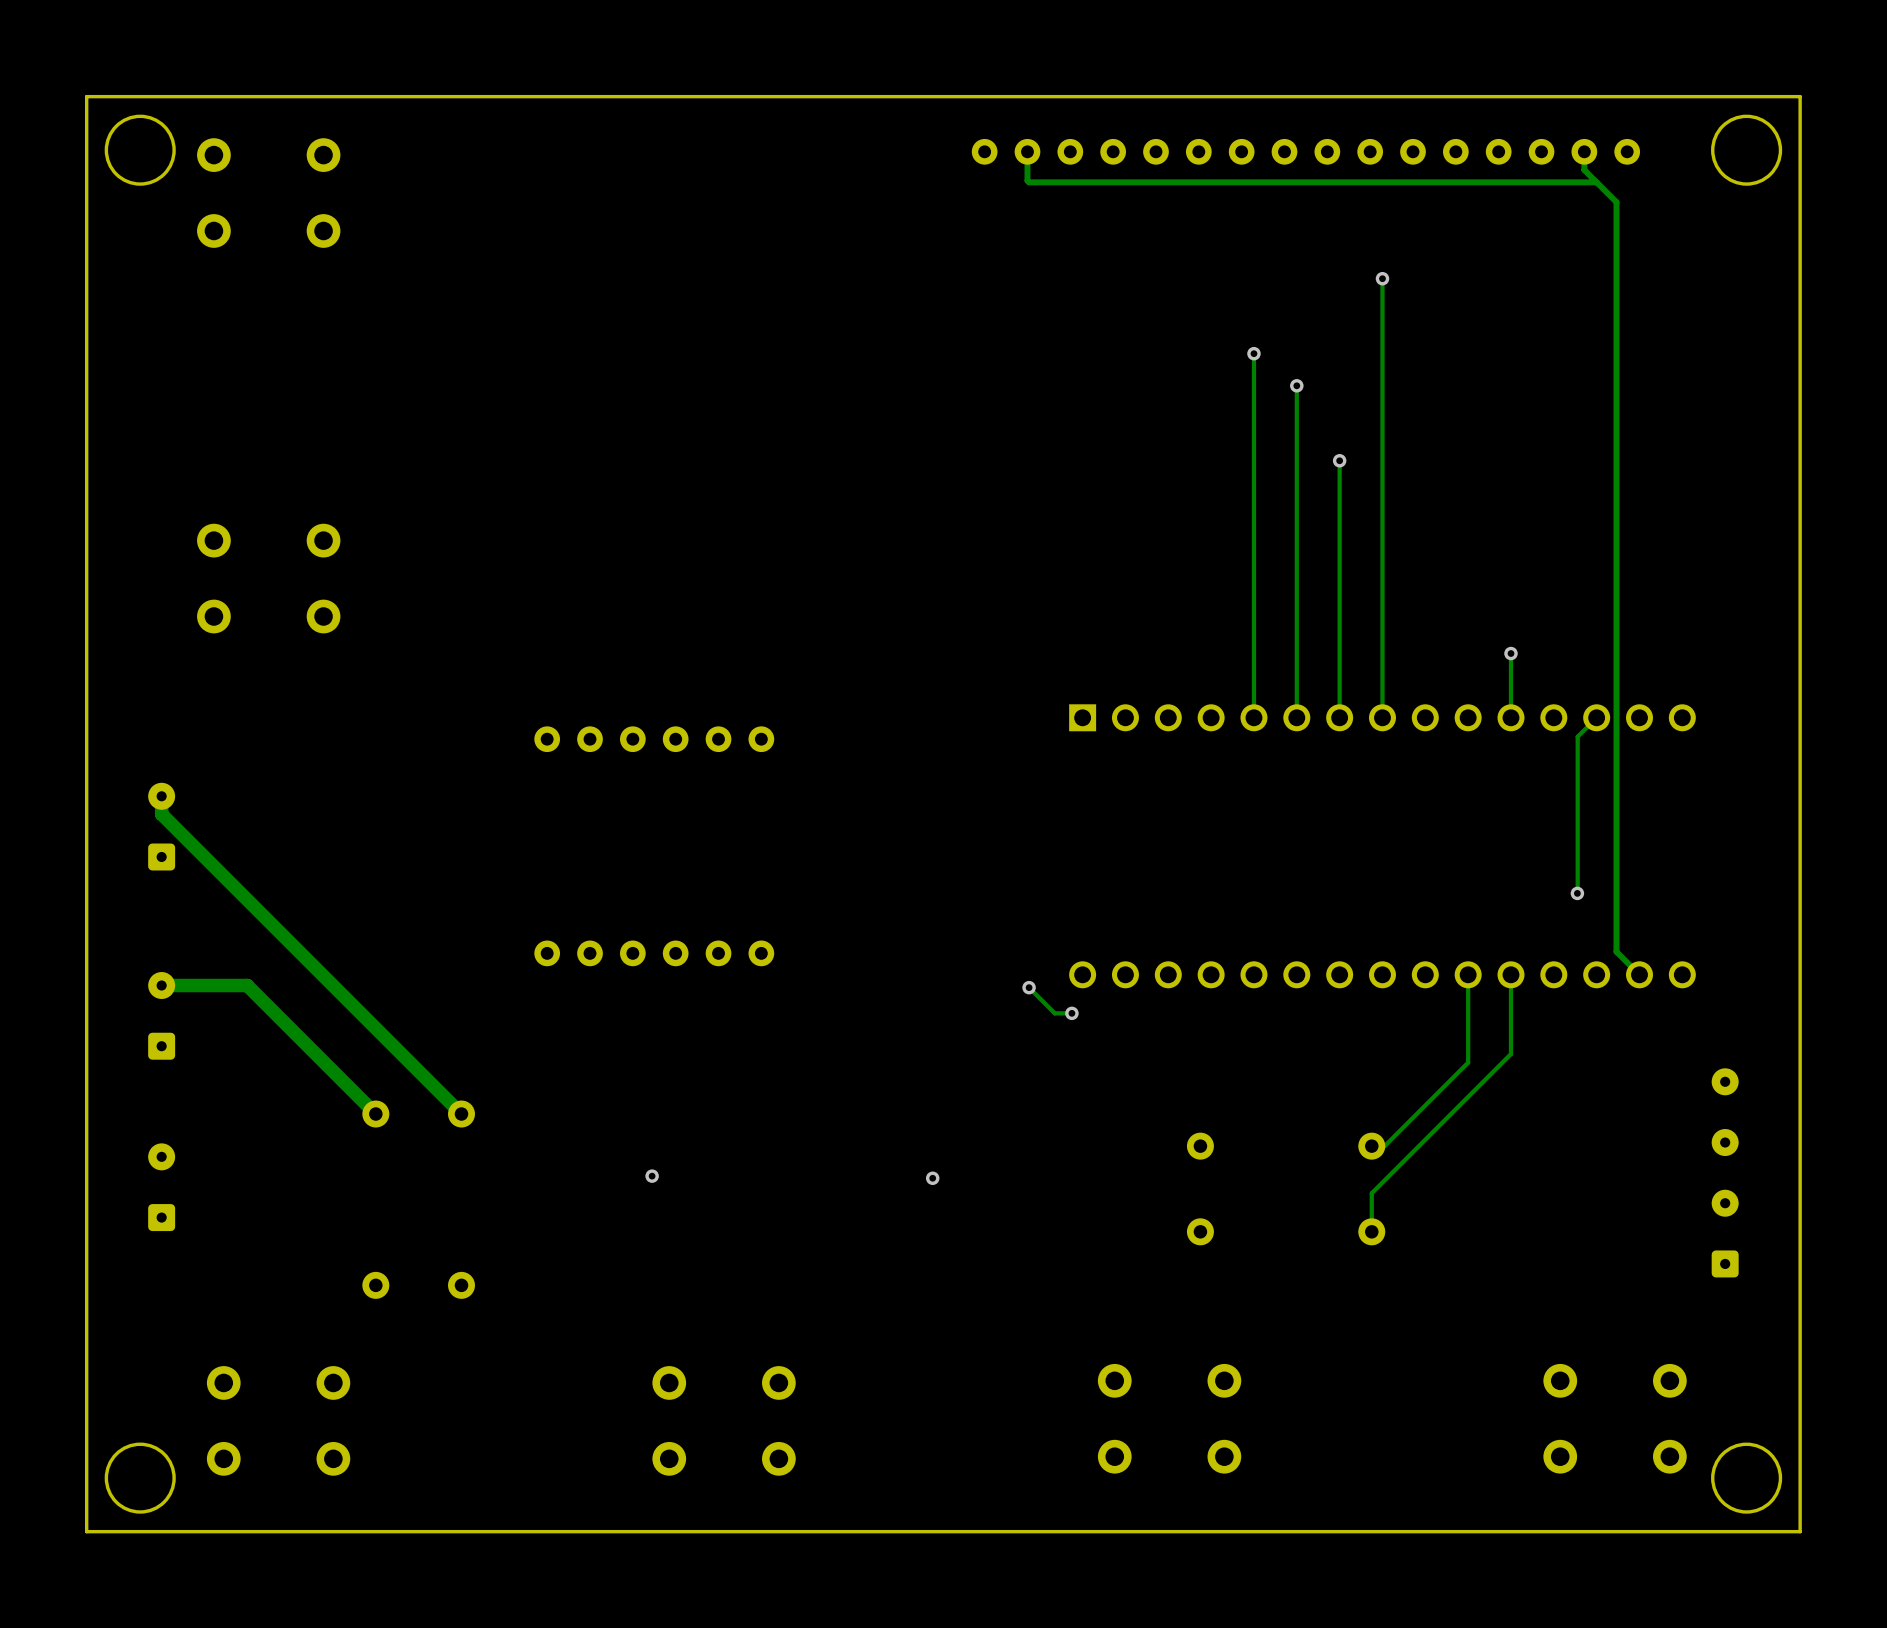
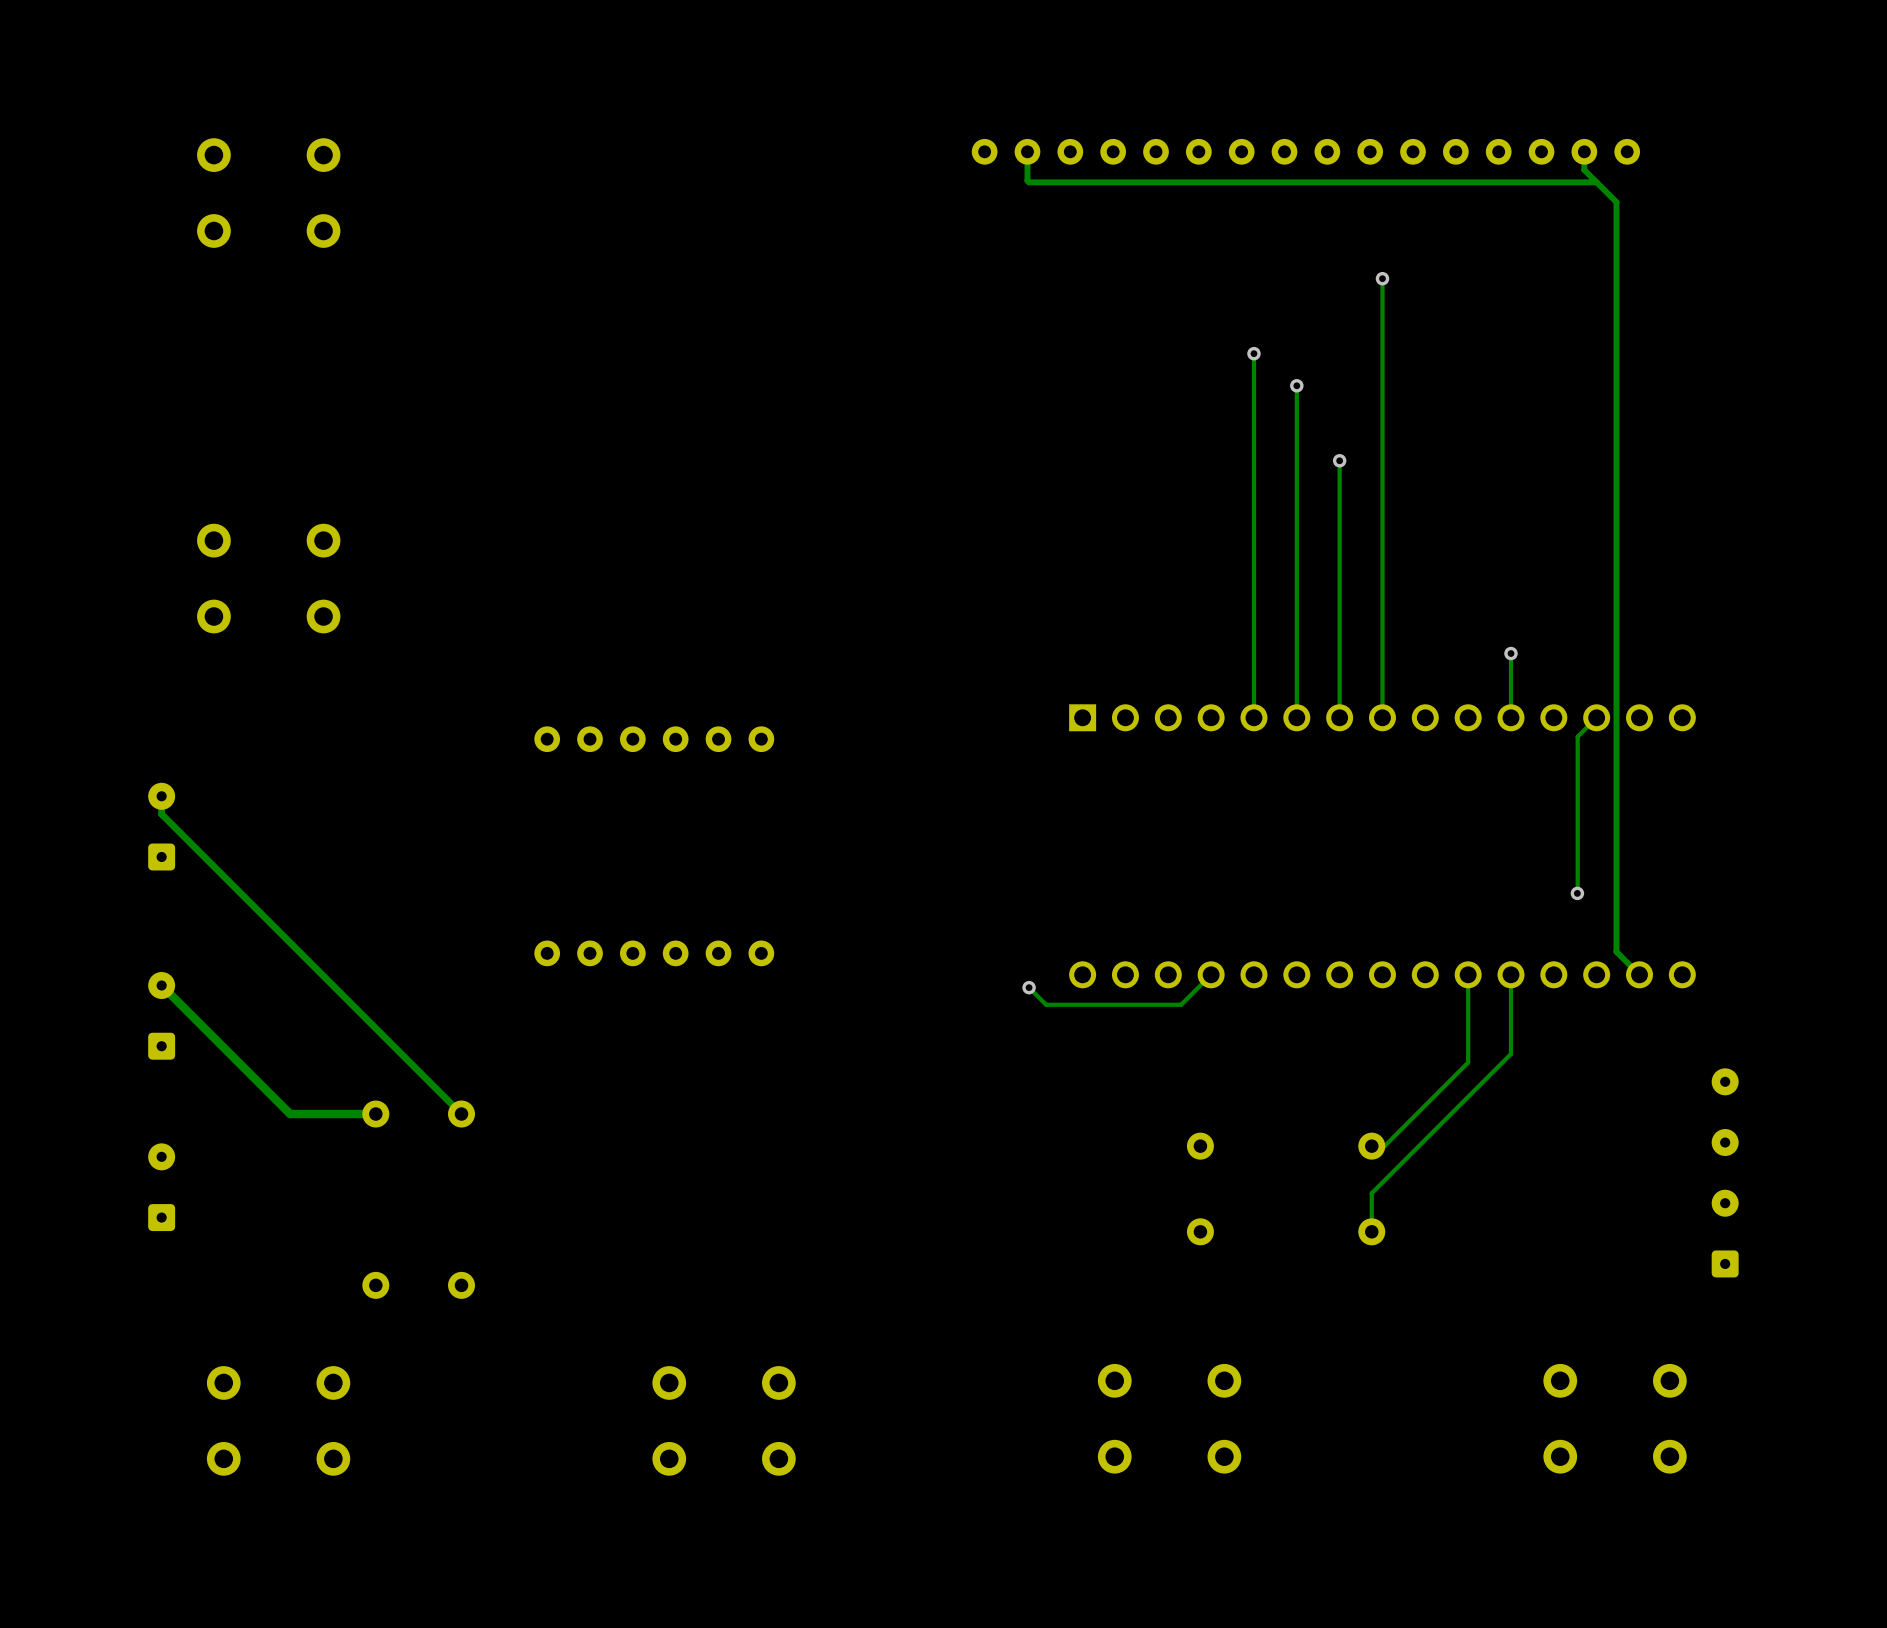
board edge: (1800, 96) (86, 96) (86, 1531) (1800, 1531) (1800, 96) -> none
round board edge: [104, 114, 176, 186] -> none
round board edge: [1711, 114, 1783, 186] -> none
track width: thick (161, 796) (161, 814) (461, 1114) -> thin (161, 796) (161, 814) (461, 1114)
track: (161, 985) (247, 985) (375, 1114) -> (161, 985) (290, 1114) (375, 1114)
track: (1046, 1004) (1054, 1013) (1071, 1013) -> (1046, 1004) (1181, 1004) (1211, 974)
via: (1071, 1013) -> none
via: (652, 1176) -> none
via: (932, 1178) -> none
round board edge: [104, 1442, 176, 1514] -> none
round board edge: [1711, 1442, 1783, 1514] -> none

